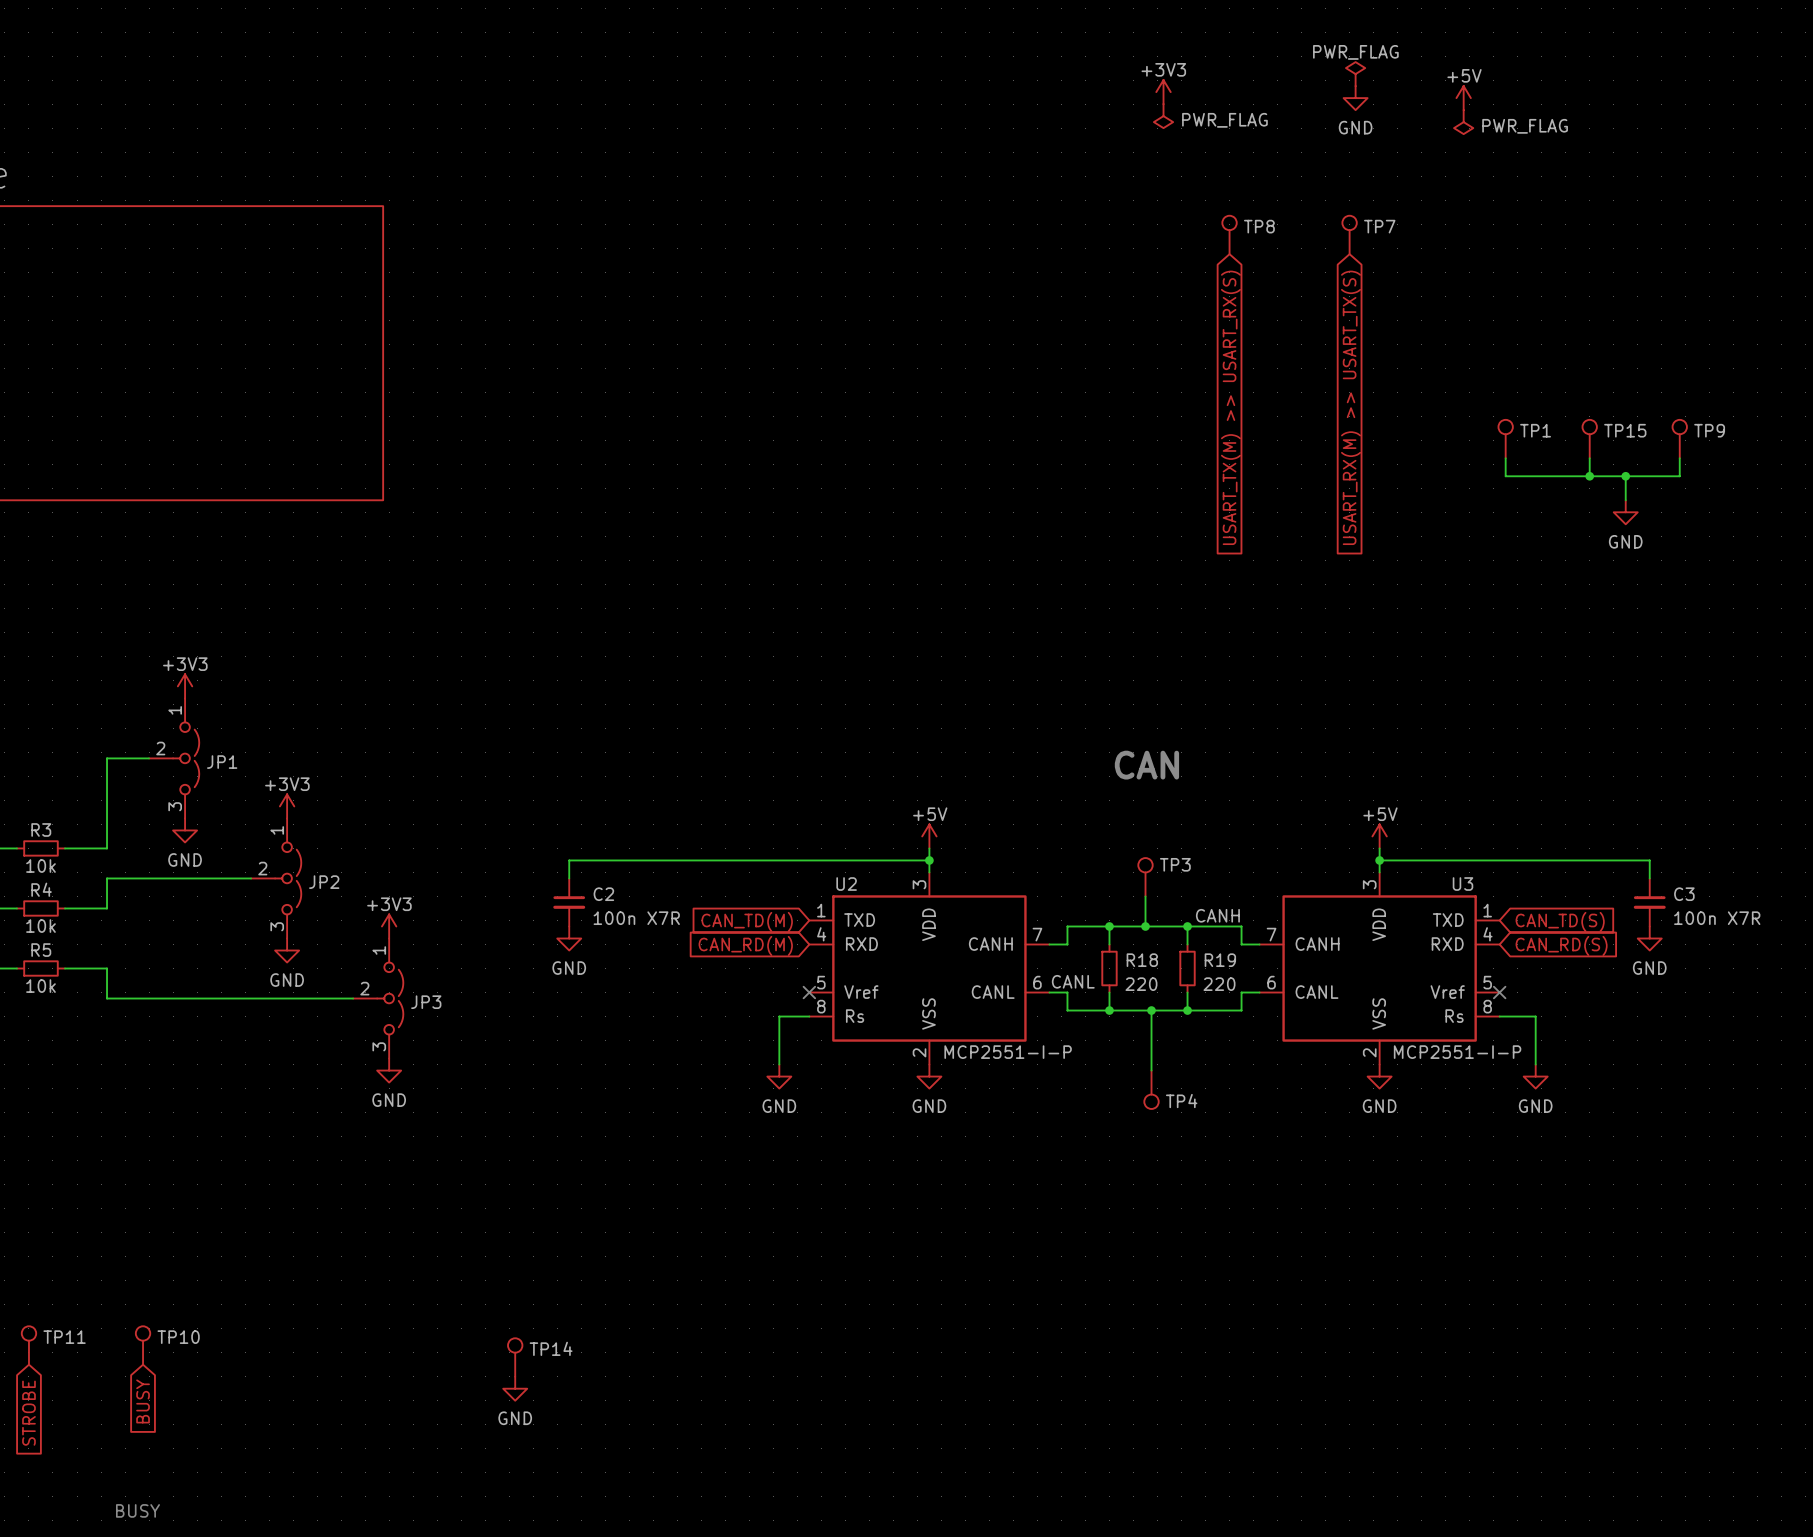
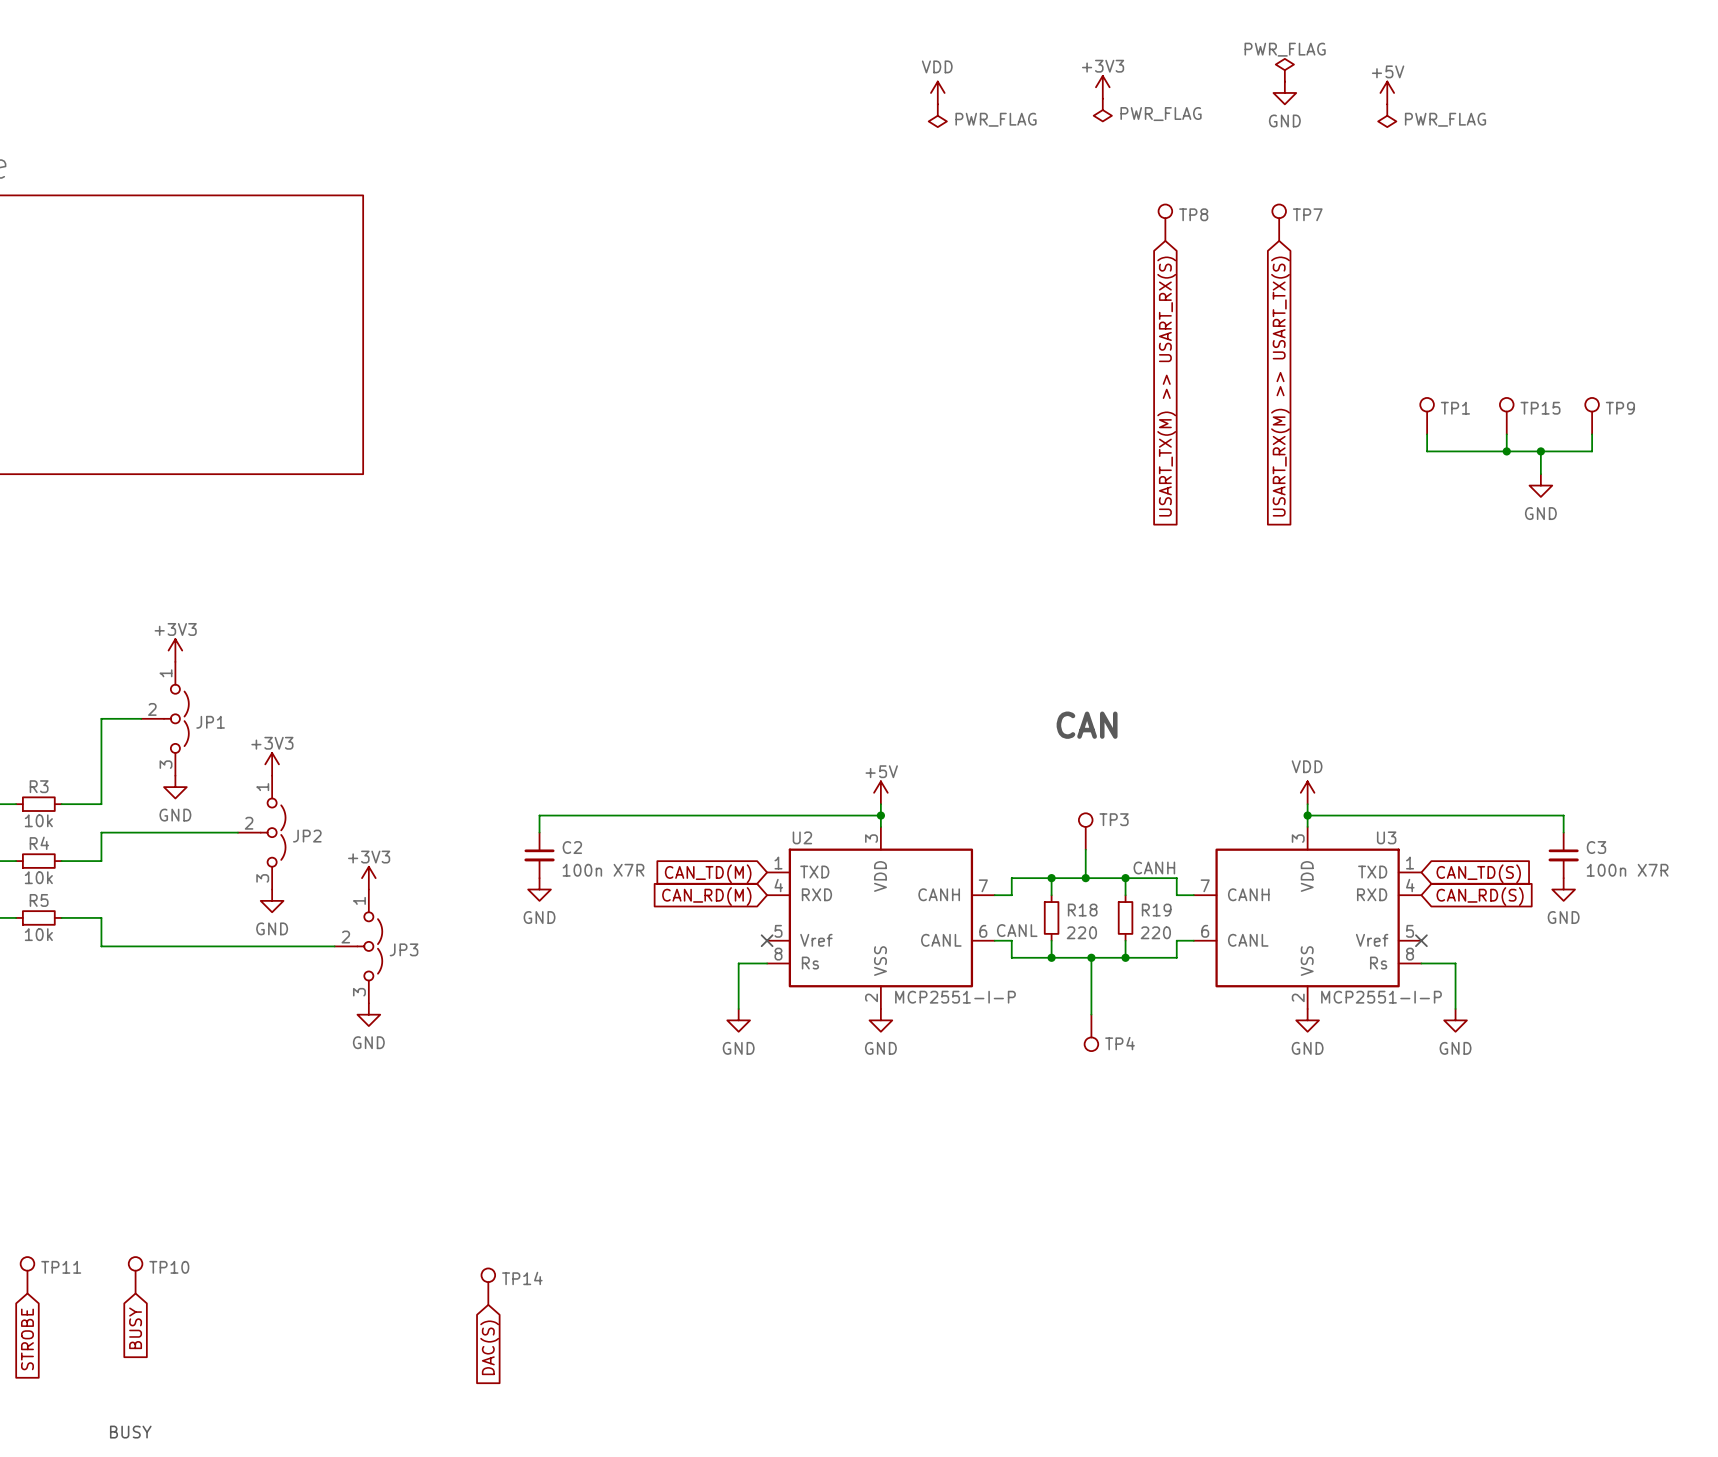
power symbol: none -> VDD (937, 92)
power symbol: none -> PWR_FLAG (937, 115)
power symbol: +5V (1379, 836) -> VDD (1307, 792)
power symbol: GND (515, 1388) -> none
global label: none -> DAC(S) (489, 1347)

